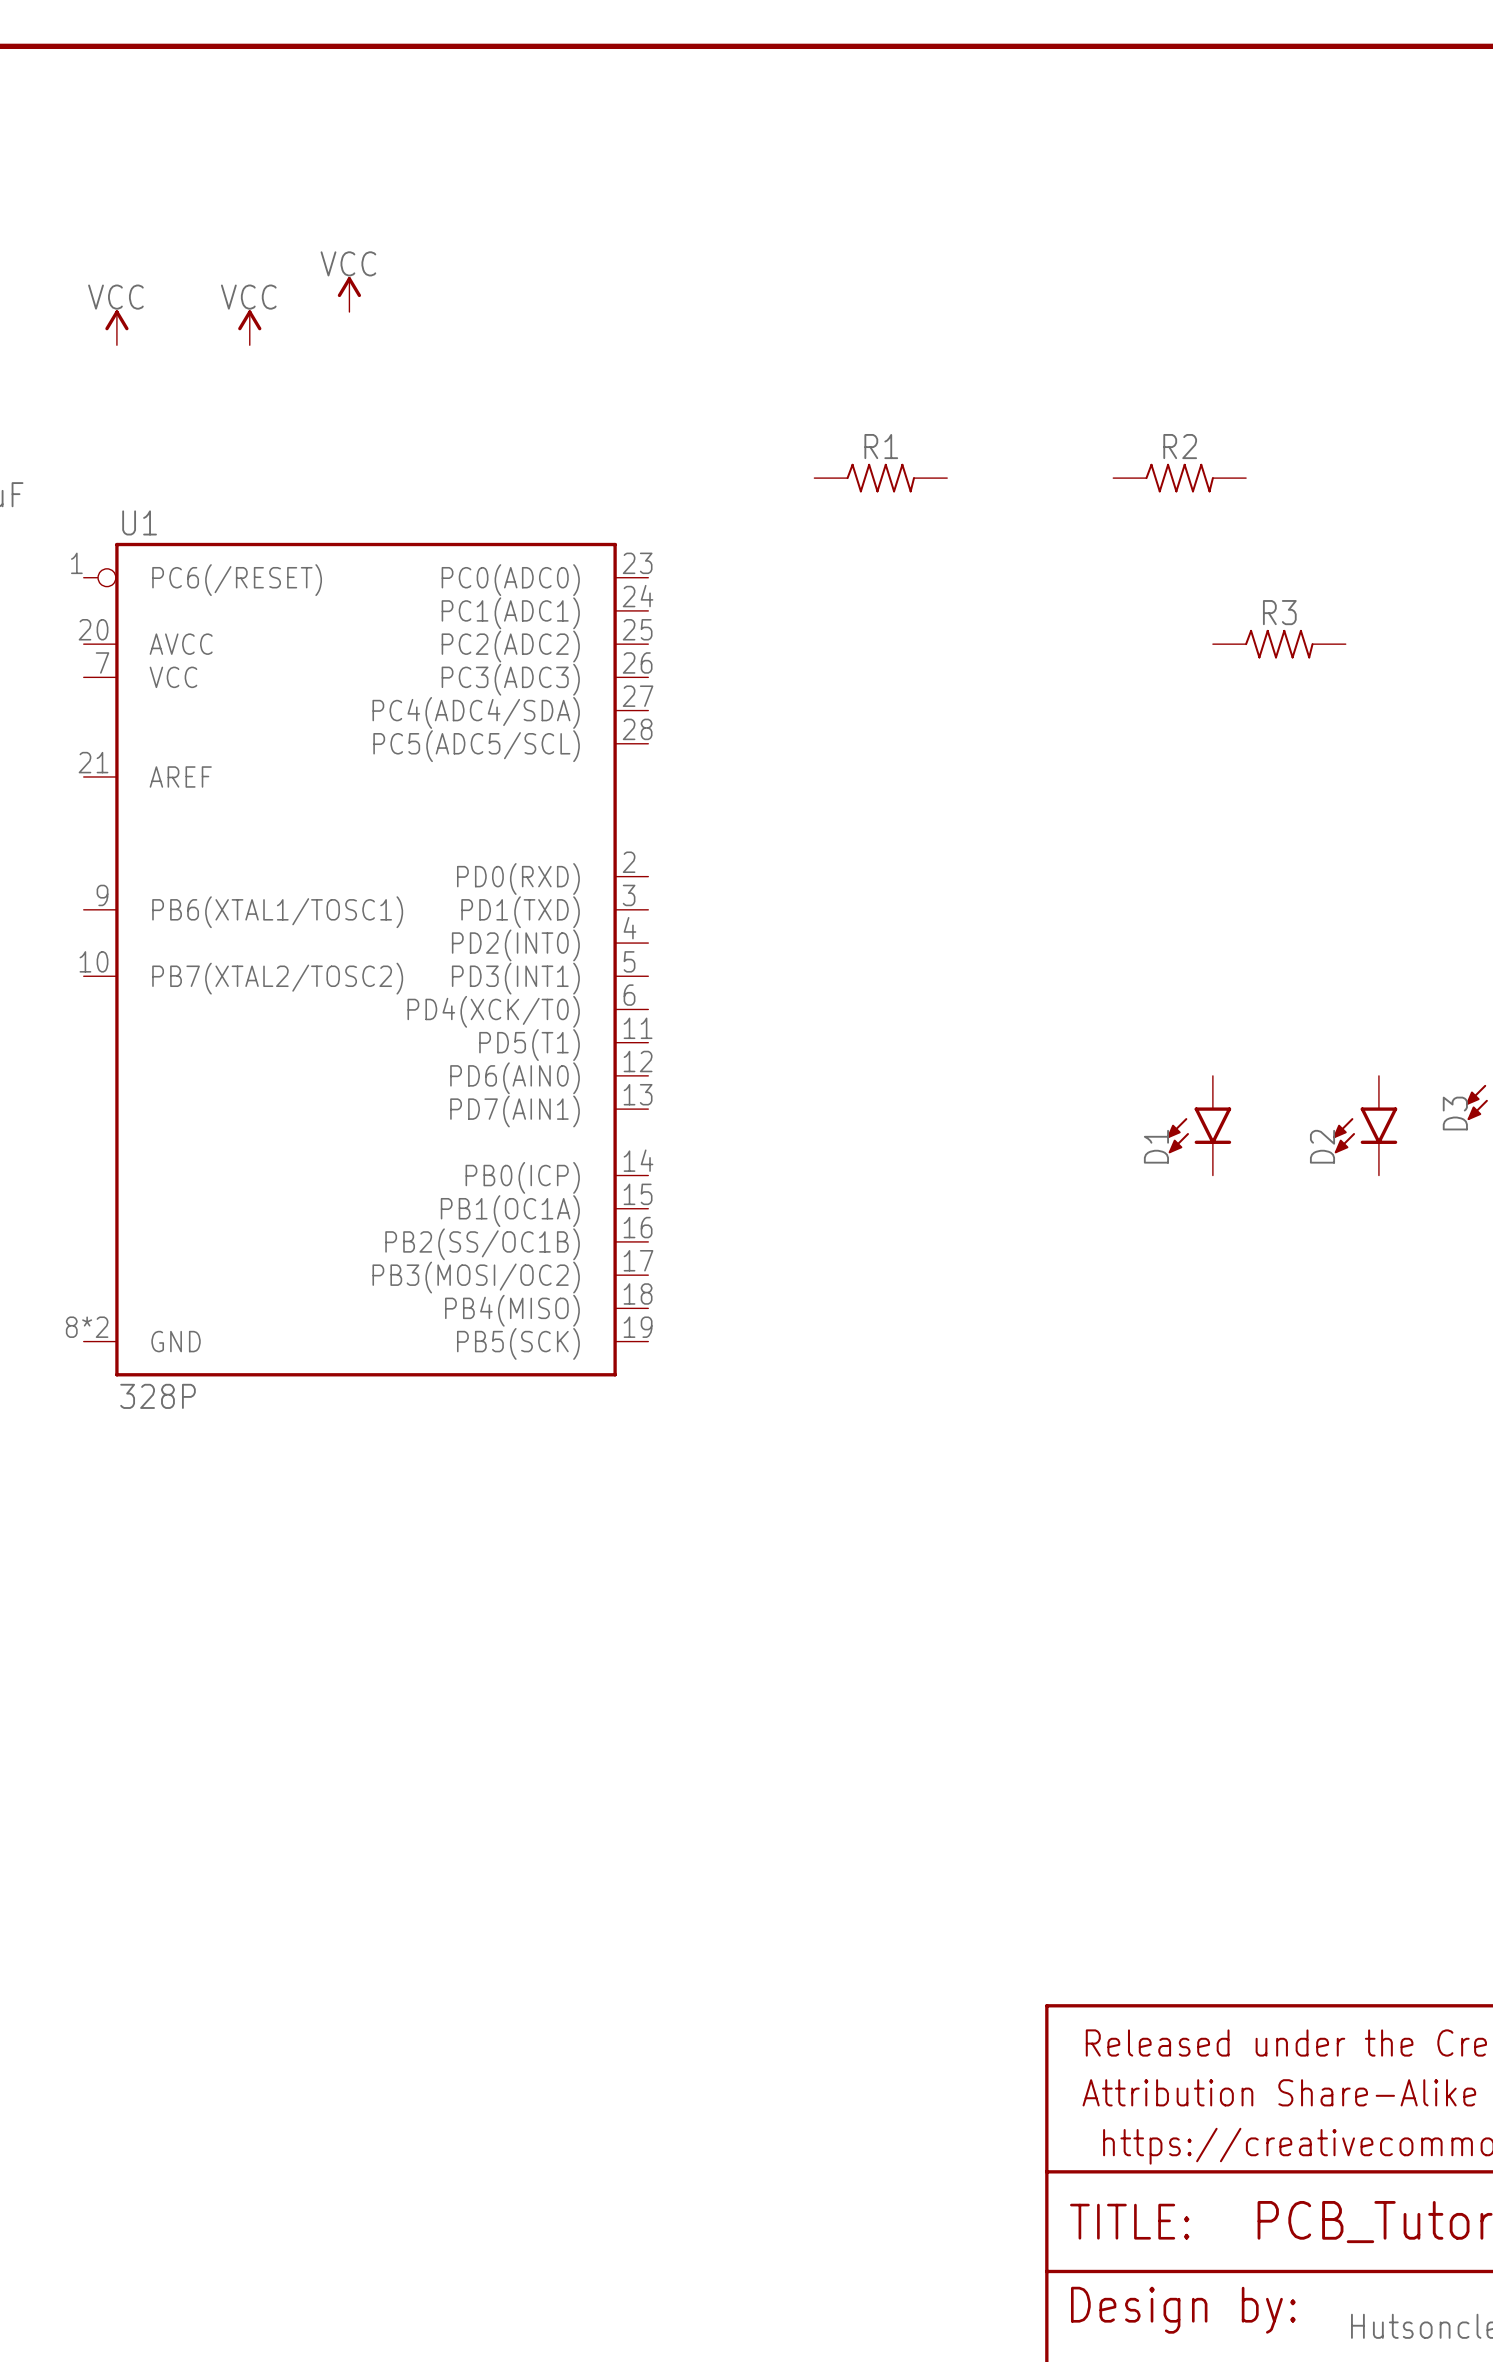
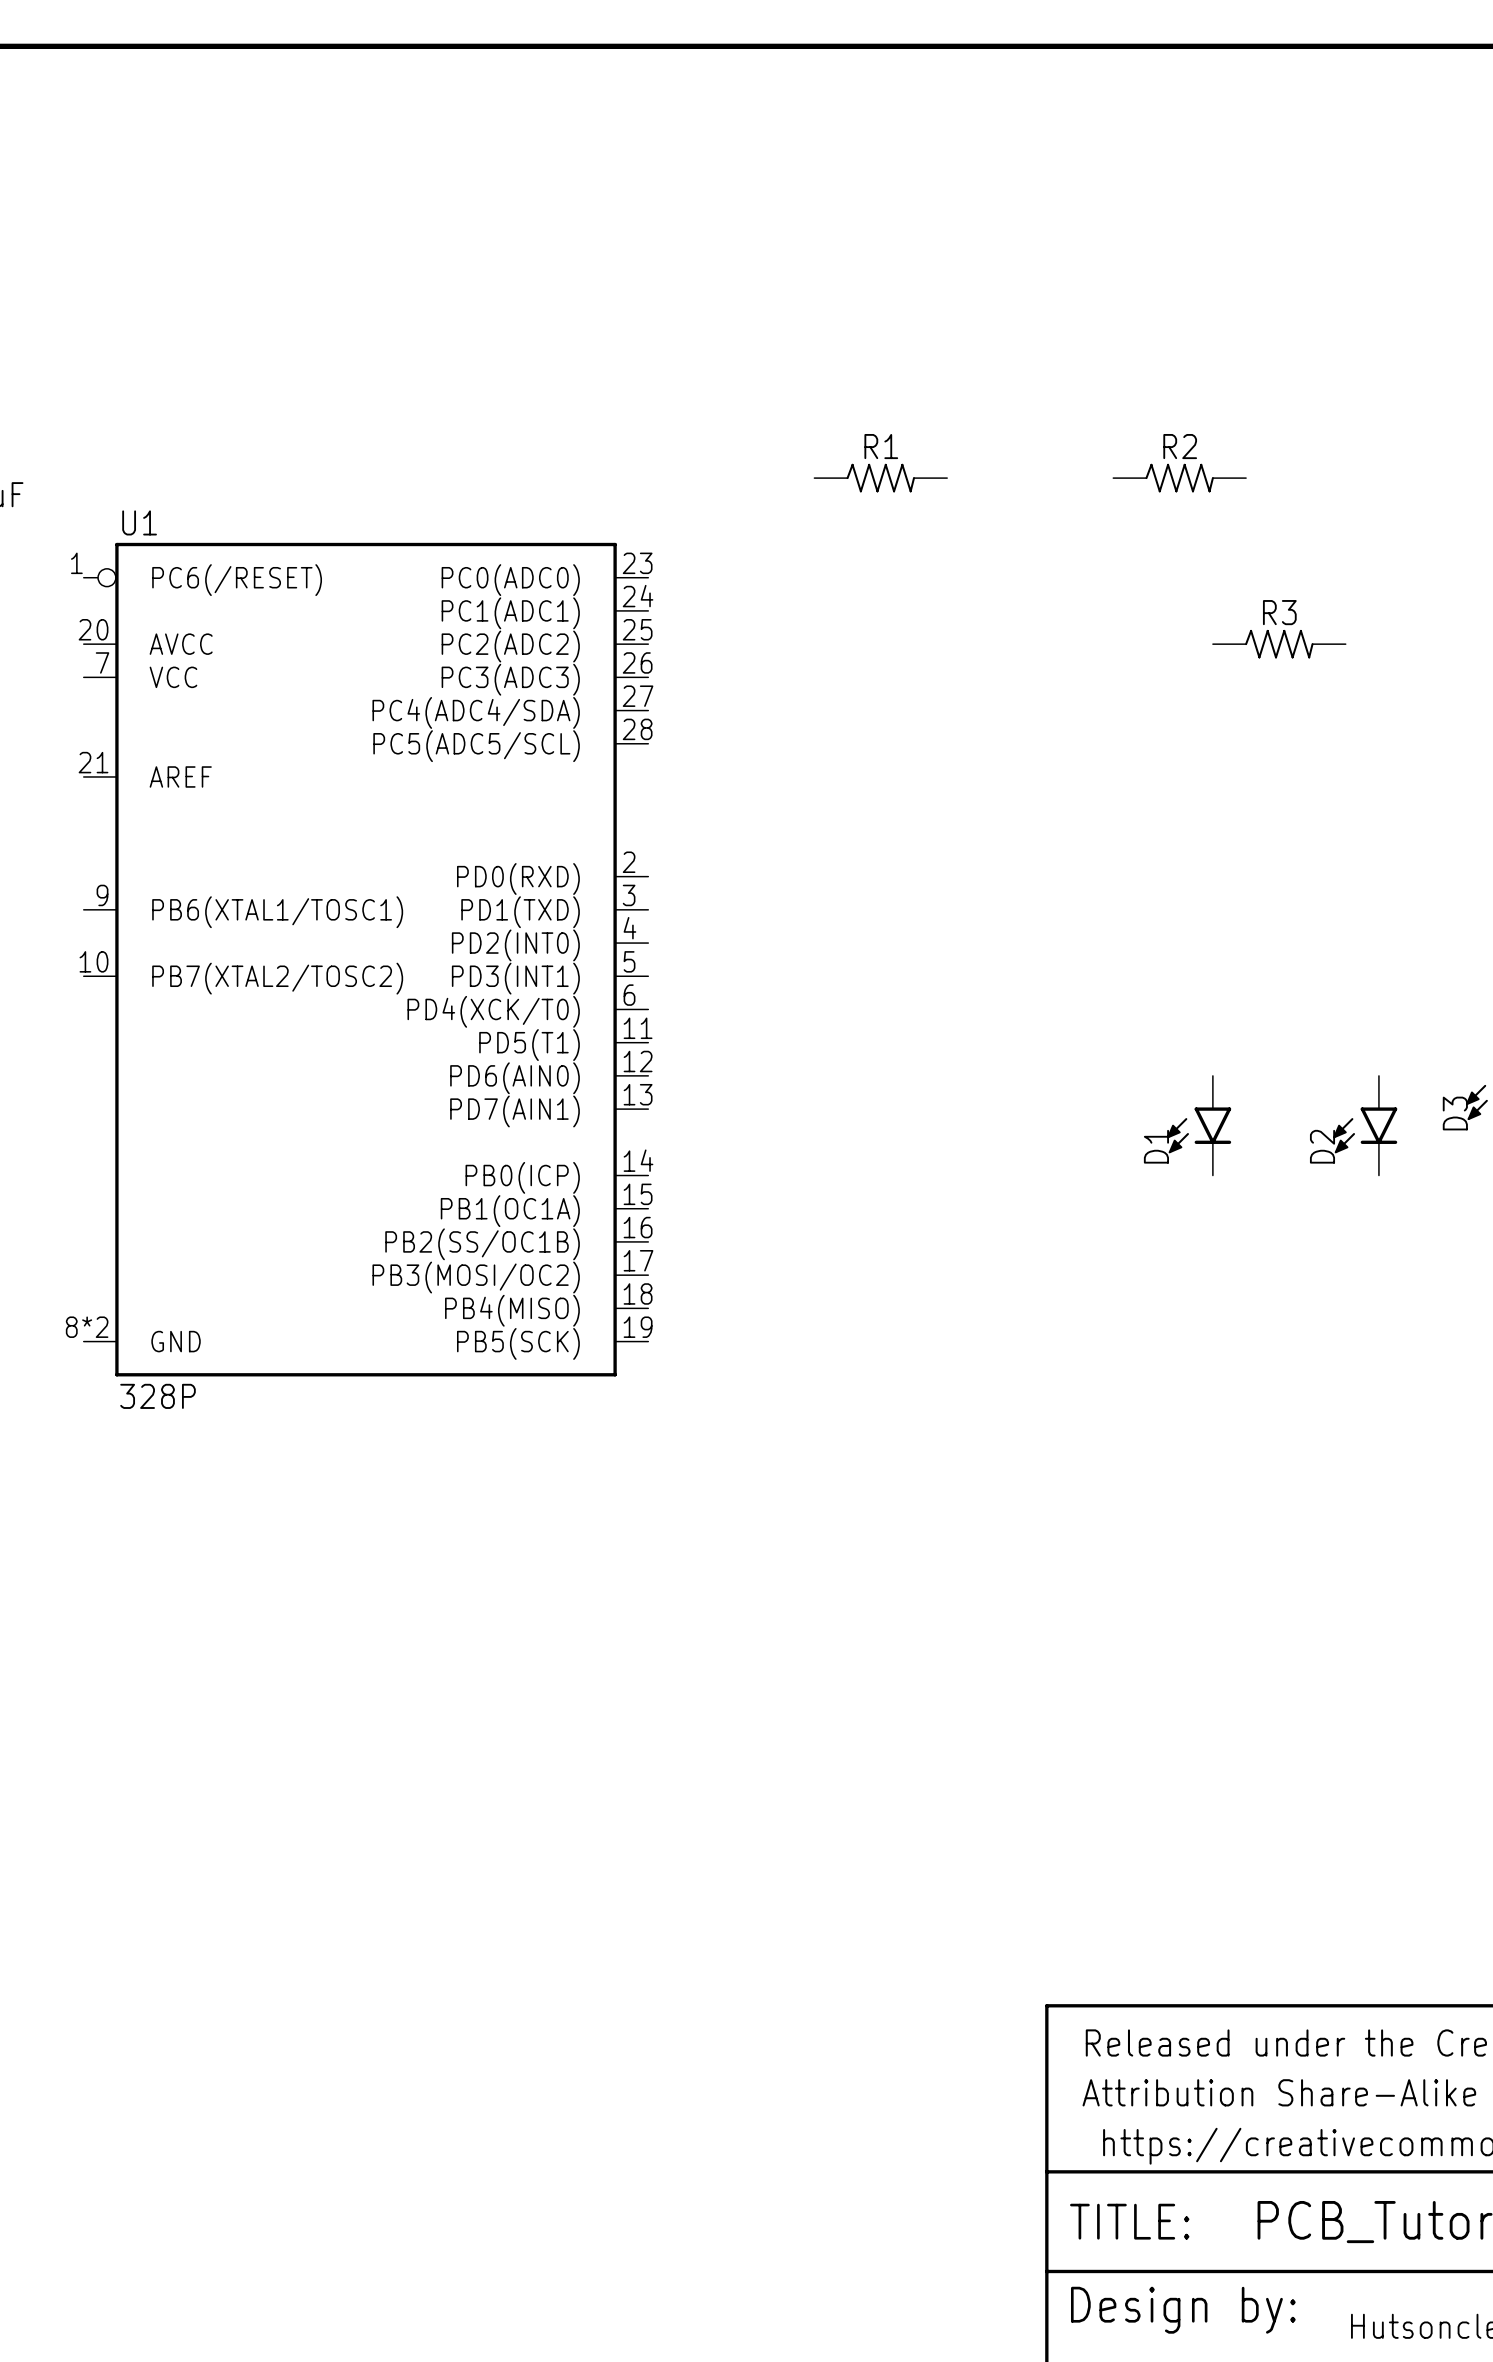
power symbol: VCC (349, 294) -> none
power symbol: VCC (116, 327) -> none
power symbol: VCC (249, 327) -> none

